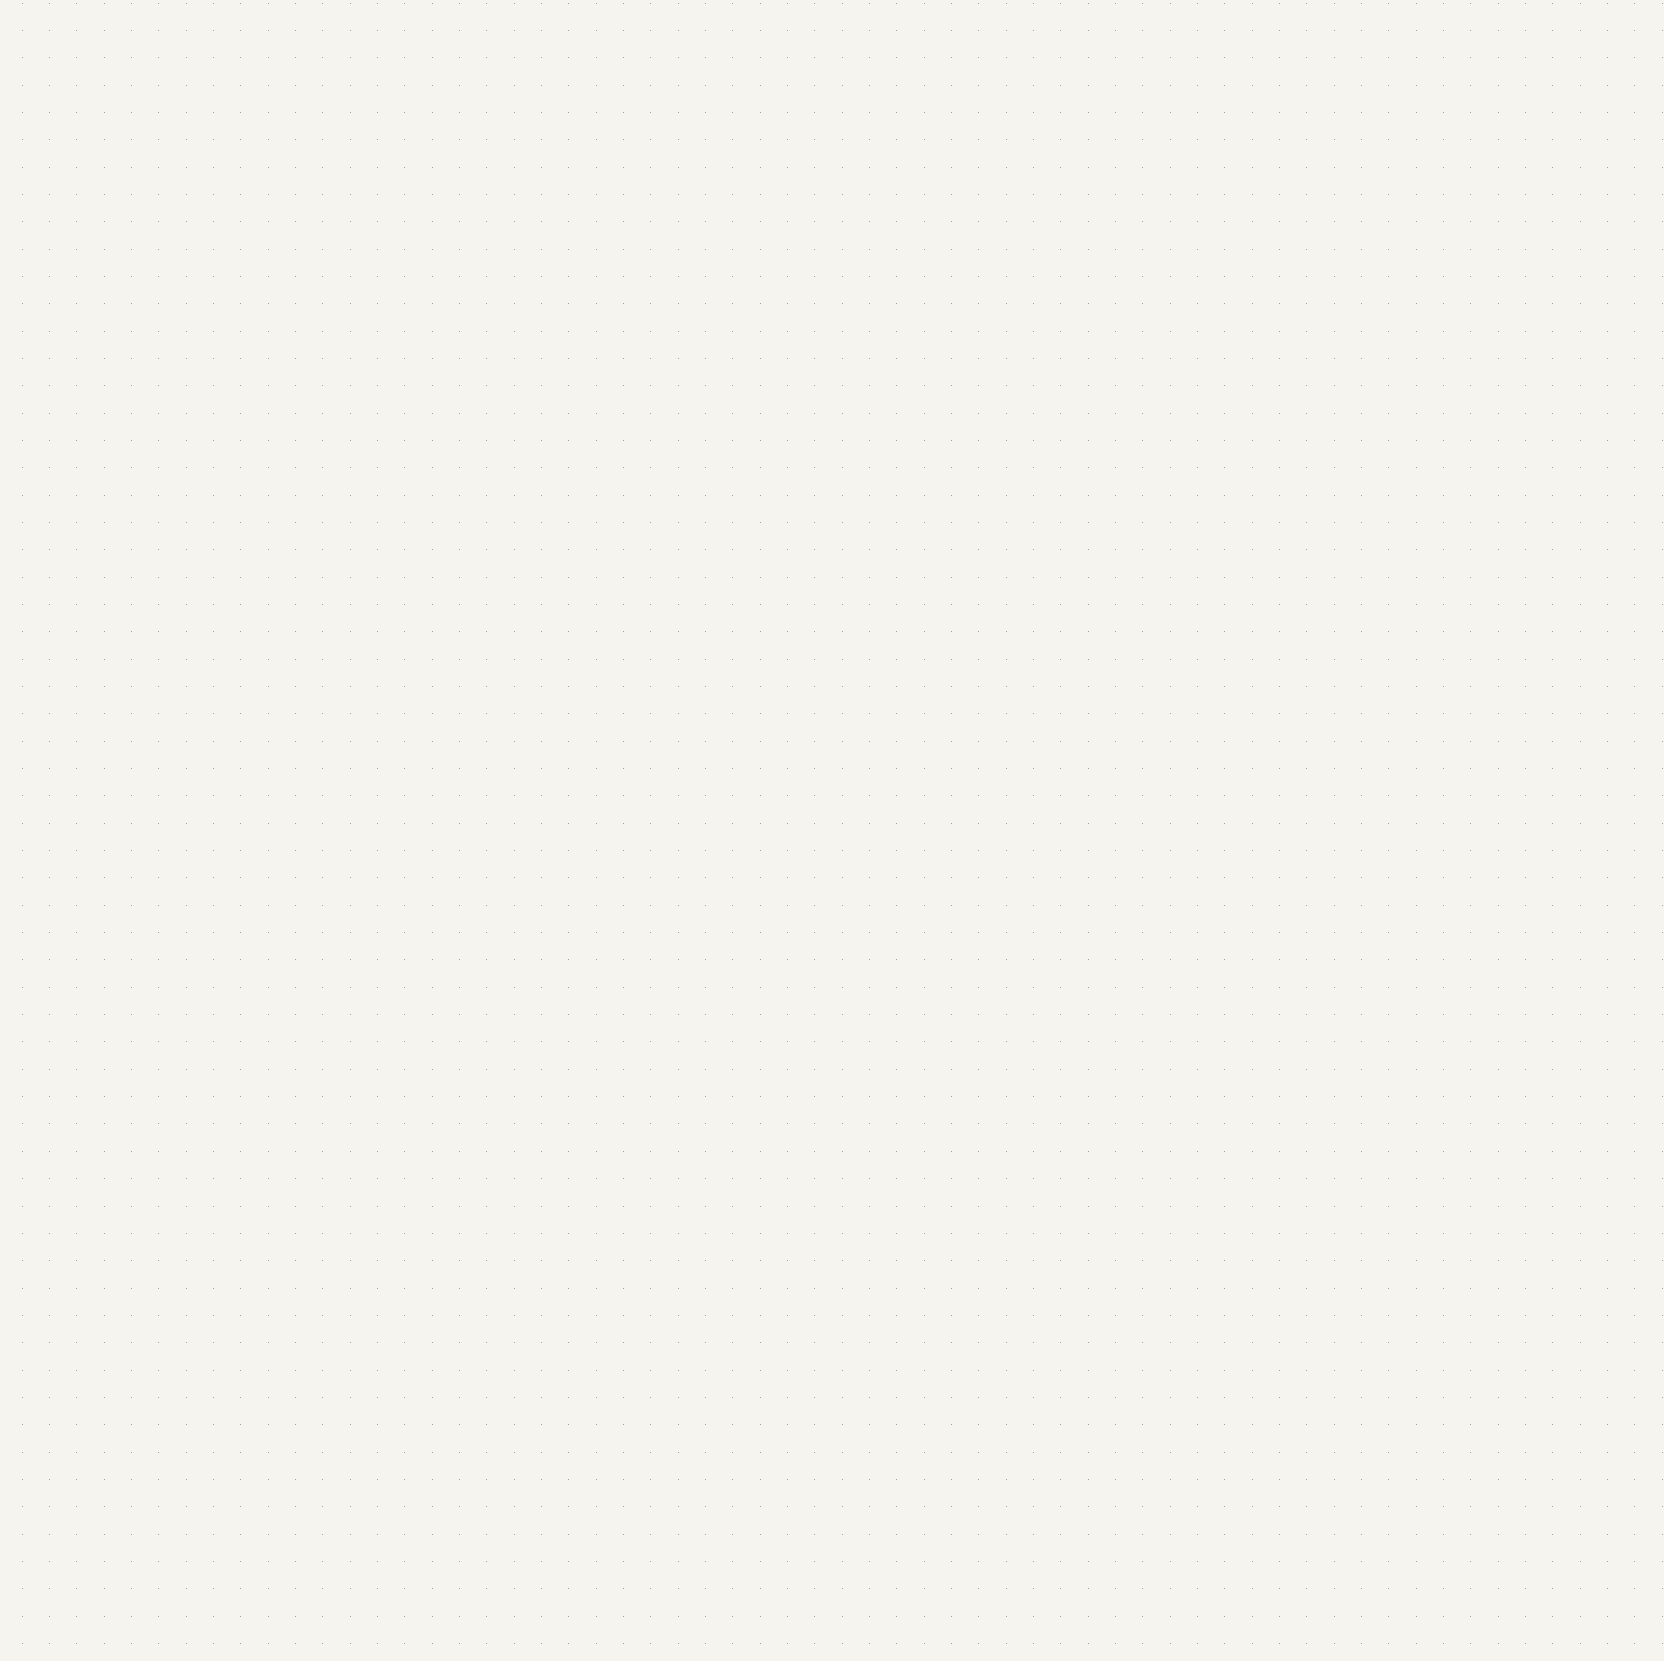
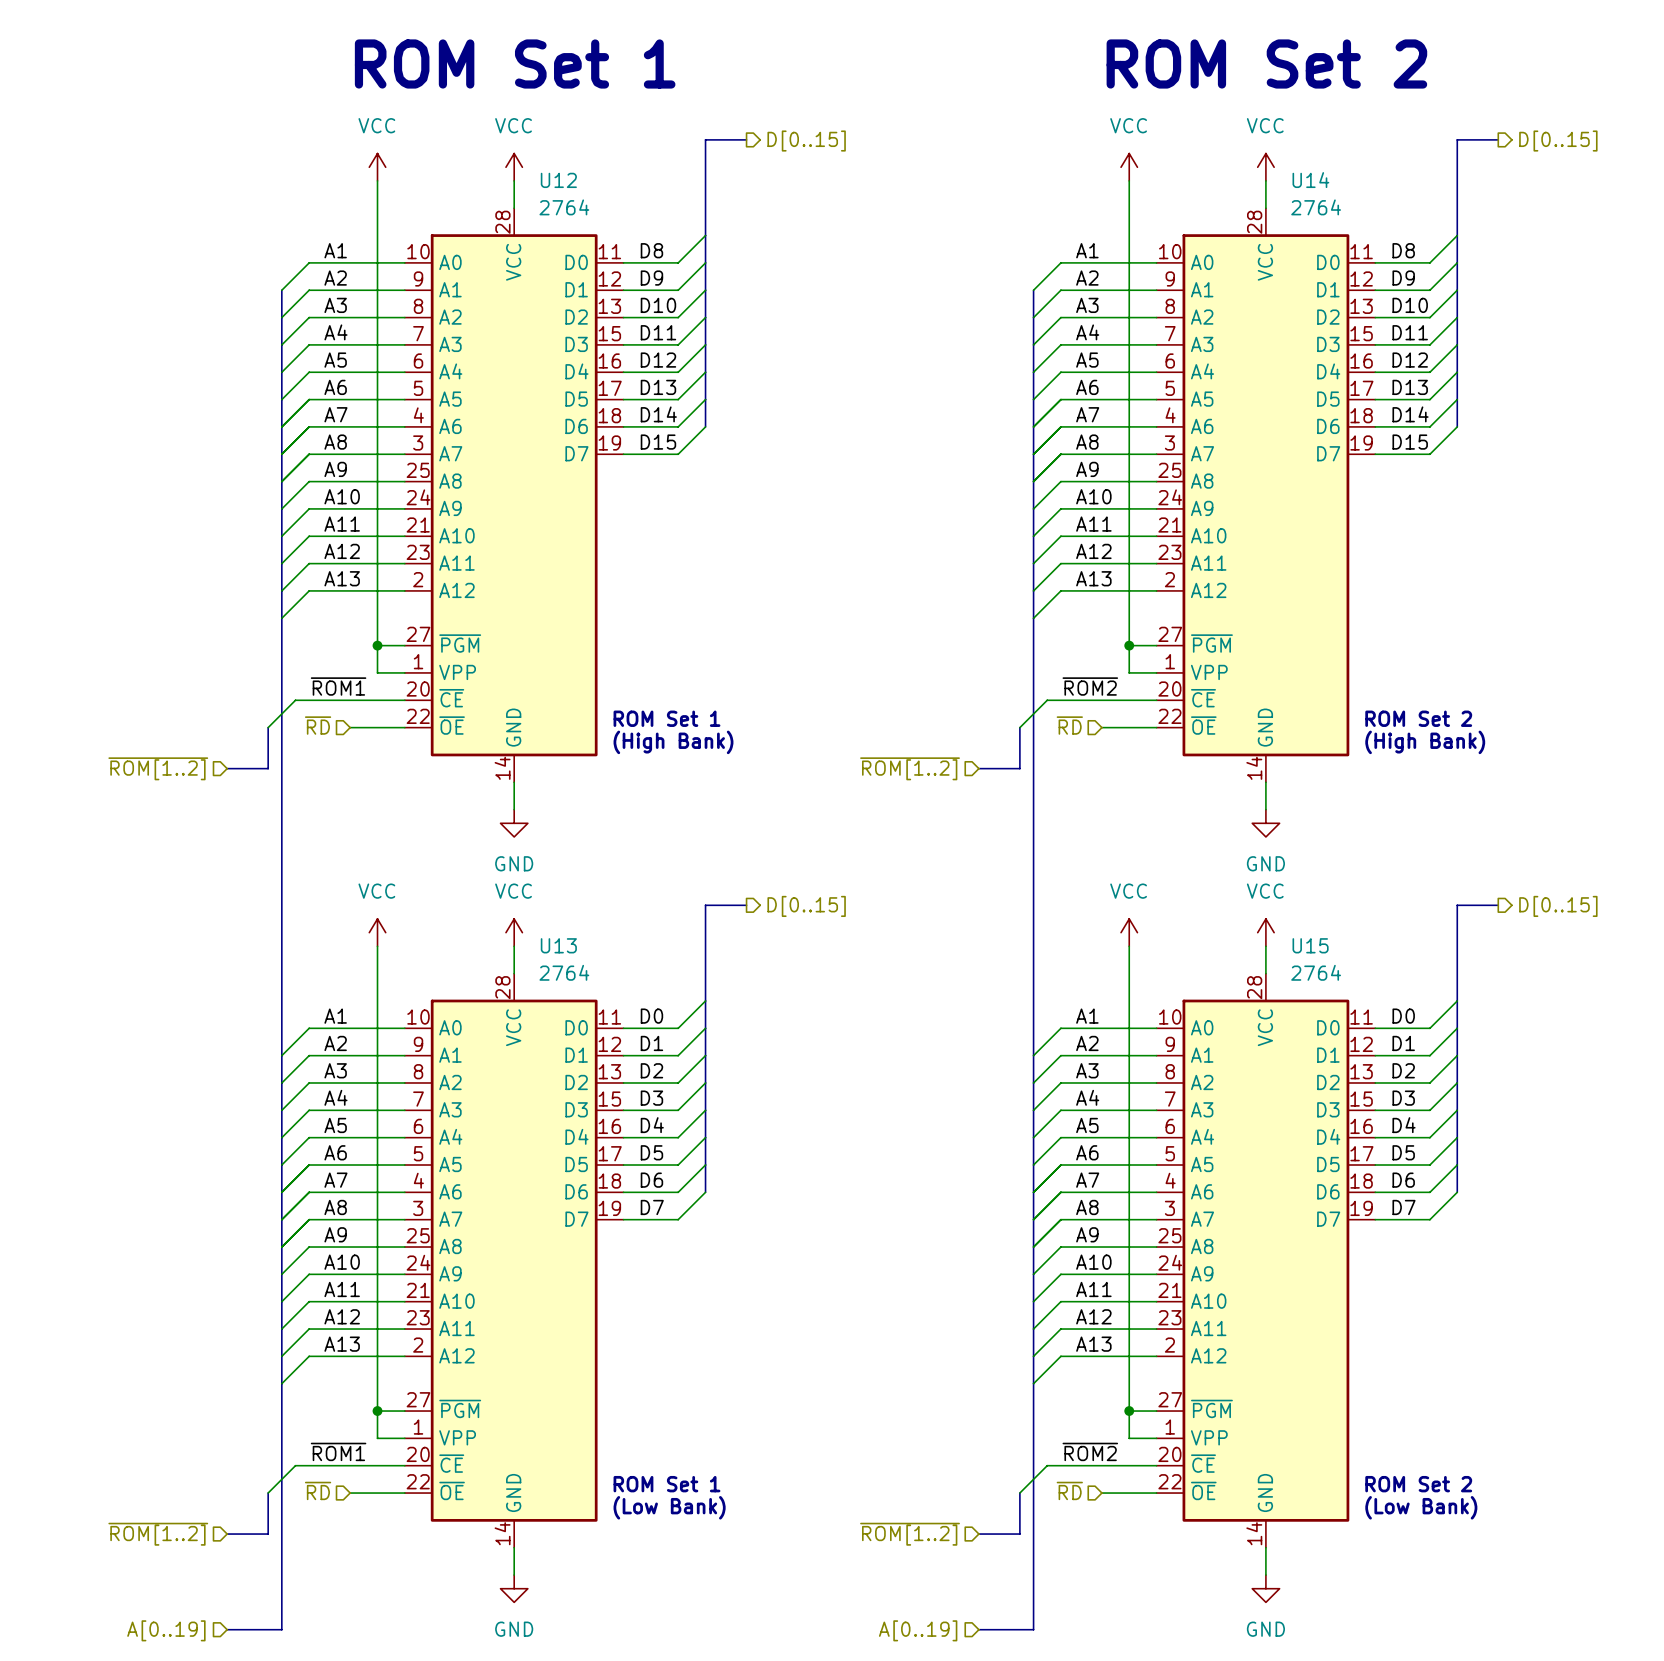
text: none -> ROM Set 1 (515, 63)
text: none -> ROM Set 2 (1266, 63)
bus: none -> (746, 139) (705, 139) (705, 426)
bus: none -> (1498, 139) (1457, 139) (1457, 426)
hierarchical label: none -> D[0..15] (806, 141)
hierarchical label: none -> D[0..15] (1558, 141)
power symbol: none -> VCC (377, 167)
power symbol: none -> VCC (514, 167)
power symbol: none -> VCC (1129, 167)
power symbol: none -> VCC (1265, 167)
wire: none -> (377, 180) (377, 672) (404, 672)
wire: none -> (514, 180) (514, 208)
wire: none -> (1129, 180) (1129, 672) (1156, 672)
wire: none -> (1265, 180) (1265, 208)
wire: none -> (705, 235) (678, 262) (623, 262)
wire: none -> (1457, 235) (1429, 262) (1375, 262)
label: none -> A1 (335, 250)
label: none -> D8 (651, 250)
label: none -> A1 (1087, 250)
label: none -> D8 (1403, 250)
wire: none -> (404, 262) (309, 262) (281, 290)
wire: none -> (705, 262) (678, 290) (623, 290)
wire: none -> (1156, 262) (1060, 262) (1033, 290)
wire: none -> (1457, 262) (1429, 290) (1375, 290)
label: none -> A2 (335, 278)
label: none -> A2 (1087, 278)
label: none -> D9 (651, 278)
label: none -> D9 (1403, 278)
bus: none -> (281, 290) (281, 1629) (227, 1629)
wire: none -> (404, 290) (309, 290) (281, 317)
wire: none -> (705, 290) (678, 317) (623, 317)
bus: none -> (1033, 290) (1033, 1629) (978, 1629)
wire: none -> (1156, 290) (1060, 290) (1033, 317)
wire: none -> (1457, 290) (1429, 317) (1375, 317)
label: none -> A3 (335, 305)
label: none -> D10 (658, 305)
label: none -> A3 (1087, 305)
label: none -> D10 (1410, 305)
wire: none -> (404, 317) (309, 317) (281, 344)
wire: none -> (705, 317) (678, 344) (623, 344)
wire: none -> (1156, 317) (1060, 317) (1033, 344)
wire: none -> (1457, 317) (1429, 344) (1375, 344)
label: none -> A4 (335, 332)
label: none -> D11 (658, 332)
label: none -> A4 (1087, 332)
label: none -> D11 (1410, 332)
wire: none -> (404, 344) (309, 344) (281, 372)
wire: none -> (705, 344) (678, 372) (623, 372)
wire: none -> (1156, 344) (1060, 344) (1033, 372)
wire: none -> (1457, 344) (1429, 372) (1375, 372)
label: none -> D12 (658, 360)
label: none -> D12 (1410, 360)
label: none -> A5 (335, 360)
label: none -> A5 (1087, 360)
wire: none -> (404, 372) (309, 372) (281, 399)
wire: none -> (705, 372) (678, 399) (623, 399)
wire: none -> (1156, 372) (1060, 372) (1033, 399)
wire: none -> (1457, 372) (1429, 399) (1375, 399)
label: none -> A6 (335, 387)
label: none -> D13 (658, 387)
label: none -> A6 (1087, 387)
label: none -> D13 (1410, 387)
wire: none -> (404, 399) (309, 399) (281, 426)
wire: none -> (705, 399) (678, 426) (623, 426)
wire: none -> (1156, 399) (1060, 399) (1033, 426)
wire: none -> (1457, 399) (1429, 426) (1375, 426)
label: none -> A7 (335, 414)
label: none -> D14 (658, 414)
label: none -> A7 (1087, 414)
label: none -> D14 (1410, 414)
wire: none -> (404, 426) (309, 426) (281, 454)
wire: none -> (705, 426) (678, 454) (623, 454)
wire: none -> (1156, 426) (1060, 426) (1033, 454)
wire: none -> (1457, 426) (1429, 454) (1375, 454)
label: none -> A8 (335, 442)
label: none -> D15 (658, 442)
label: none -> A8 (1087, 442)
label: none -> D15 (1410, 442)
wire: none -> (404, 454) (309, 454) (281, 481)
wire: none -> (1156, 454) (1060, 454) (1033, 481)
label: none -> A9 (335, 469)
label: none -> A9 (1087, 469)
wire: none -> (404, 481) (309, 481) (281, 508)
wire: none -> (1156, 481) (1060, 481) (1033, 508)
U12: none -> 2764 (514, 495)
U14: none -> 2764 (1265, 495)
label: none -> A10 (342, 496)
label: none -> A10 (1093, 496)
wire: none -> (404, 508) (309, 508) (281, 536)
wire: none -> (1156, 508) (1060, 508) (1033, 536)
label: none -> A11 (342, 524)
label: none -> A11 (1093, 524)
wire: none -> (404, 536) (309, 536) (281, 563)
wire: none -> (1156, 536) (1060, 536) (1033, 563)
label: none -> A12 (342, 551)
label: none -> A12 (1093, 551)
wire: none -> (404, 563) (309, 563) (281, 590)
wire: none -> (1156, 563) (1060, 563) (1033, 590)
label: none -> A13 (342, 578)
label: none -> A13 (1093, 578)
wire: none -> (404, 590) (309, 590) (281, 618)
wire: none -> (1156, 590) (1060, 590) (1033, 618)
wire: none -> (377, 645) (404, 645)
junction: none -> (377, 645)
wire: none -> (1129, 645) (1156, 645)
junction: none -> (1129, 645)
label: none -> ~{ROM1} (338, 686)
label: none -> ~{ROM2} (1090, 686)
wire: none -> (404, 700) (295, 700) (268, 727)
wire: none -> (1156, 700) (1047, 700) (1019, 727)
text: none -> ROM Set 1 (666, 718)
text: none -> ROM Set 2 (1418, 718)
hierarchical label: none -> ~{RD} (318, 725)
hierarchical label: none -> ~{RD} (1069, 725)
bus: none -> (268, 727) (268, 768) (227, 768)
wire: none -> (350, 727) (404, 727)
bus: none -> (1019, 727) (1019, 768) (978, 768)
wire: none -> (1101, 727) (1156, 727)
text: none -> (High Bank) (673, 742)
text: none -> (High Bank) (1425, 742)
hierarchical label: none -> ~{ROM[1..2]} (158, 768)
hierarchical label: none -> ~{ROM[1..2]} (910, 768)
wire: none -> (514, 782) (514, 809)
wire: none -> (1265, 782) (1265, 809)
power symbol: none -> GND (514, 823)
power symbol: none -> GND (1265, 823)
bus: none -> (746, 905) (705, 905) (705, 1192)
hierarchical label: none -> D[0..15] (806, 906)
bus: none -> (1498, 905) (1457, 905) (1457, 1192)
hierarchical label: none -> D[0..15] (1558, 906)
power symbol: none -> VCC (377, 932)
power symbol: none -> VCC (514, 932)
power symbol: none -> VCC (1129, 932)
power symbol: none -> VCC (1265, 932)
wire: none -> (377, 946) (377, 1438) (404, 1438)
wire: none -> (514, 946) (514, 973)
wire: none -> (1129, 946) (1129, 1438) (1156, 1438)
wire: none -> (1265, 946) (1265, 973)
wire: none -> (705, 1000) (678, 1028) (623, 1028)
wire: none -> (1457, 1000) (1429, 1028) (1375, 1028)
label: none -> A1 (335, 1016)
label: none -> D0 (651, 1016)
label: none -> A1 (1087, 1016)
label: none -> D0 (1403, 1016)
wire: none -> (404, 1028) (309, 1028) (281, 1055)
wire: none -> (705, 1028) (678, 1055) (623, 1055)
wire: none -> (1156, 1028) (1060, 1028) (1033, 1055)
wire: none -> (1457, 1028) (1429, 1055) (1375, 1055)
label: none -> A2 (335, 1043)
label: none -> D1 (651, 1043)
label: none -> A2 (1087, 1043)
label: none -> D1 (1403, 1043)
wire: none -> (404, 1055) (309, 1055) (281, 1082)
wire: none -> (705, 1055) (678, 1082) (623, 1082)
wire: none -> (1156, 1055) (1060, 1055) (1033, 1082)
wire: none -> (1457, 1055) (1429, 1082) (1375, 1082)
label: none -> A3 (335, 1070)
label: none -> D2 (651, 1070)
label: none -> A3 (1087, 1070)
label: none -> D2 (1403, 1070)
wire: none -> (404, 1082) (309, 1082) (281, 1110)
wire: none -> (705, 1082) (678, 1110) (623, 1110)
wire: none -> (1156, 1082) (1060, 1082) (1033, 1110)
wire: none -> (1457, 1082) (1429, 1110) (1375, 1110)
label: none -> A4 (335, 1097)
label: none -> D3 (651, 1098)
label: none -> A4 (1087, 1097)
label: none -> D3 (1403, 1098)
wire: none -> (404, 1110) (309, 1110) (281, 1137)
wire: none -> (705, 1110) (678, 1137) (623, 1137)
wire: none -> (1156, 1110) (1060, 1110) (1033, 1137)
wire: none -> (1457, 1110) (1429, 1137) (1375, 1137)
label: none -> A5 (335, 1125)
label: none -> D4 (652, 1125)
label: none -> A5 (1087, 1125)
label: none -> D4 (1404, 1125)
wire: none -> (404, 1137) (309, 1137) (281, 1165)
wire: none -> (705, 1137) (678, 1165) (623, 1165)
wire: none -> (1156, 1137) (1060, 1137) (1033, 1165)
wire: none -> (1457, 1137) (1429, 1165) (1375, 1165)
label: none -> A6 (335, 1152)
label: none -> D5 (651, 1152)
label: none -> A6 (1087, 1152)
label: none -> D5 (1403, 1152)
wire: none -> (404, 1165) (309, 1165) (281, 1192)
wire: none -> (705, 1165) (678, 1192) (623, 1192)
wire: none -> (1156, 1165) (1060, 1165) (1033, 1192)
wire: none -> (1457, 1165) (1429, 1192) (1375, 1192)
label: none -> A7 (335, 1180)
label: none -> D6 (651, 1180)
label: none -> A7 (1087, 1180)
label: none -> D6 (1403, 1180)
wire: none -> (404, 1192) (309, 1192) (281, 1219)
wire: none -> (705, 1192) (678, 1219) (623, 1219)
wire: none -> (1156, 1192) (1060, 1192) (1033, 1219)
wire: none -> (1457, 1192) (1429, 1219) (1375, 1219)
label: none -> A8 (335, 1207)
label: none -> D7 (652, 1207)
label: none -> A8 (1087, 1207)
label: none -> D7 (1404, 1207)
wire: none -> (404, 1219) (309, 1219) (281, 1247)
wire: none -> (1156, 1219) (1060, 1219) (1033, 1247)
label: none -> A9 (335, 1234)
label: none -> A9 (1087, 1234)
wire: none -> (404, 1247) (309, 1247) (281, 1274)
wire: none -> (1156, 1247) (1060, 1247) (1033, 1274)
U13: none -> 2764 (514, 1260)
U15: none -> 2764 (1265, 1260)
label: none -> A10 (342, 1262)
label: none -> A10 (1093, 1262)
wire: none -> (404, 1274) (309, 1274) (281, 1301)
wire: none -> (1156, 1274) (1060, 1274) (1033, 1301)
label: none -> A11 (342, 1289)
label: none -> A11 (1093, 1289)
wire: none -> (404, 1301) (309, 1301) (281, 1329)
wire: none -> (1156, 1301) (1060, 1301) (1033, 1329)
label: none -> A12 (342, 1316)
label: none -> A12 (1093, 1316)
wire: none -> (404, 1329) (309, 1329) (281, 1356)
wire: none -> (1156, 1329) (1060, 1329) (1033, 1356)
label: none -> A13 (342, 1344)
label: none -> A13 (1093, 1344)
wire: none -> (404, 1356) (309, 1356) (281, 1383)
wire: none -> (1156, 1356) (1060, 1356) (1033, 1383)
wire: none -> (377, 1411) (404, 1411)
junction: none -> (377, 1411)
wire: none -> (1129, 1411) (1156, 1411)
junction: none -> (1129, 1411)
label: none -> ~{ROM1} (338, 1451)
label: none -> ~{ROM2} (1090, 1451)
wire: none -> (404, 1465) (295, 1465) (268, 1493)
wire: none -> (1156, 1465) (1047, 1465) (1019, 1493)
text: none -> ROM Set 1 (666, 1484)
text: none -> ROM Set 2 (1418, 1484)
hierarchical label: none -> ~{RD} (318, 1490)
hierarchical label: none -> ~{RD} (1069, 1490)
bus: none -> (268, 1493) (268, 1534) (227, 1534)
wire: none -> (350, 1493) (404, 1493)
bus: none -> (1019, 1493) (1019, 1534) (978, 1534)
wire: none -> (1101, 1493) (1156, 1493)
text: none -> (Low Bank) (669, 1507)
text: none -> (Low Bank) (1421, 1507)
hierarchical label: none -> ~{ROM[1..2]} (158, 1534)
hierarchical label: none -> ~{ROM[1..2]} (910, 1534)
wire: none -> (514, 1547) (514, 1575)
wire: none -> (1265, 1547) (1265, 1575)
power symbol: none -> GND (514, 1588)
power symbol: none -> GND (1265, 1588)
hierarchical label: none -> A[0..19] (166, 1630)
hierarchical label: none -> A[0..19] (918, 1630)

